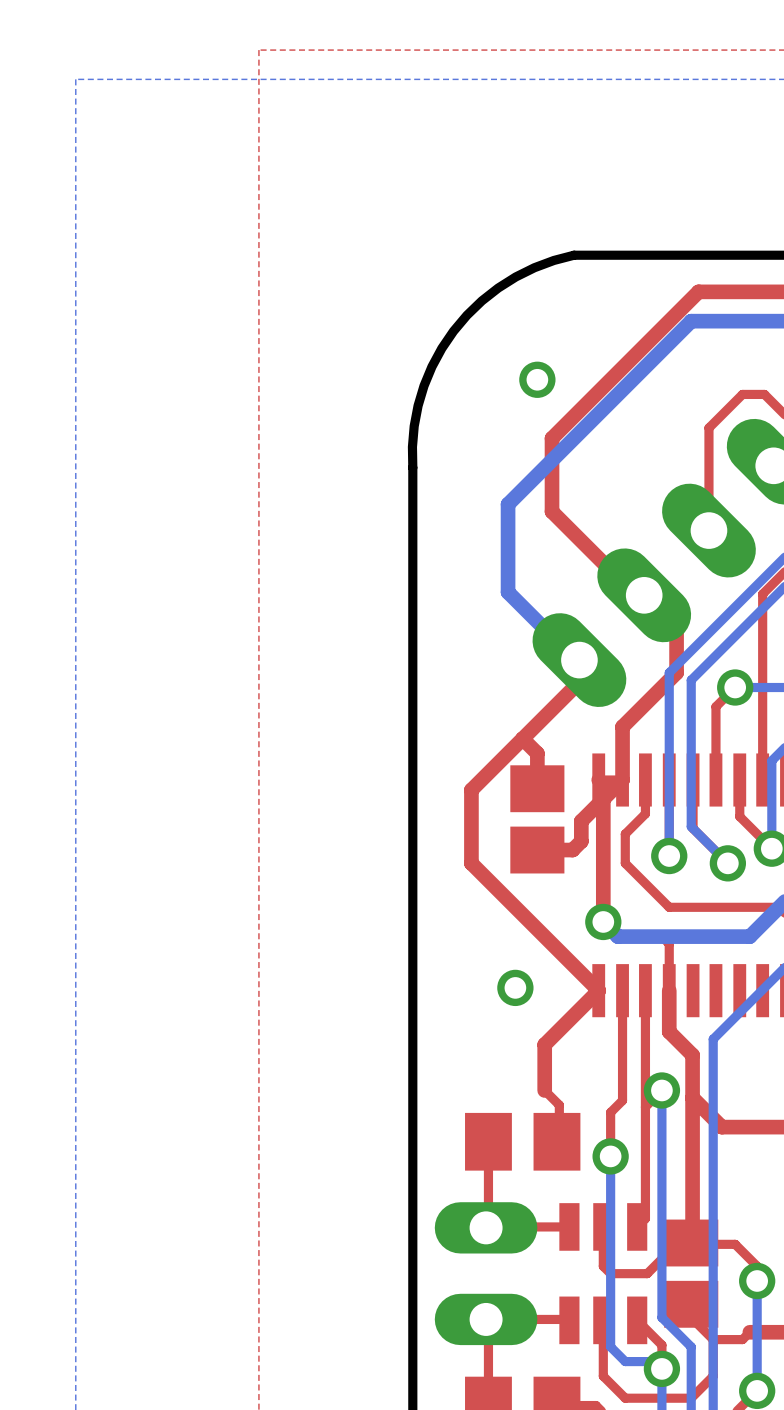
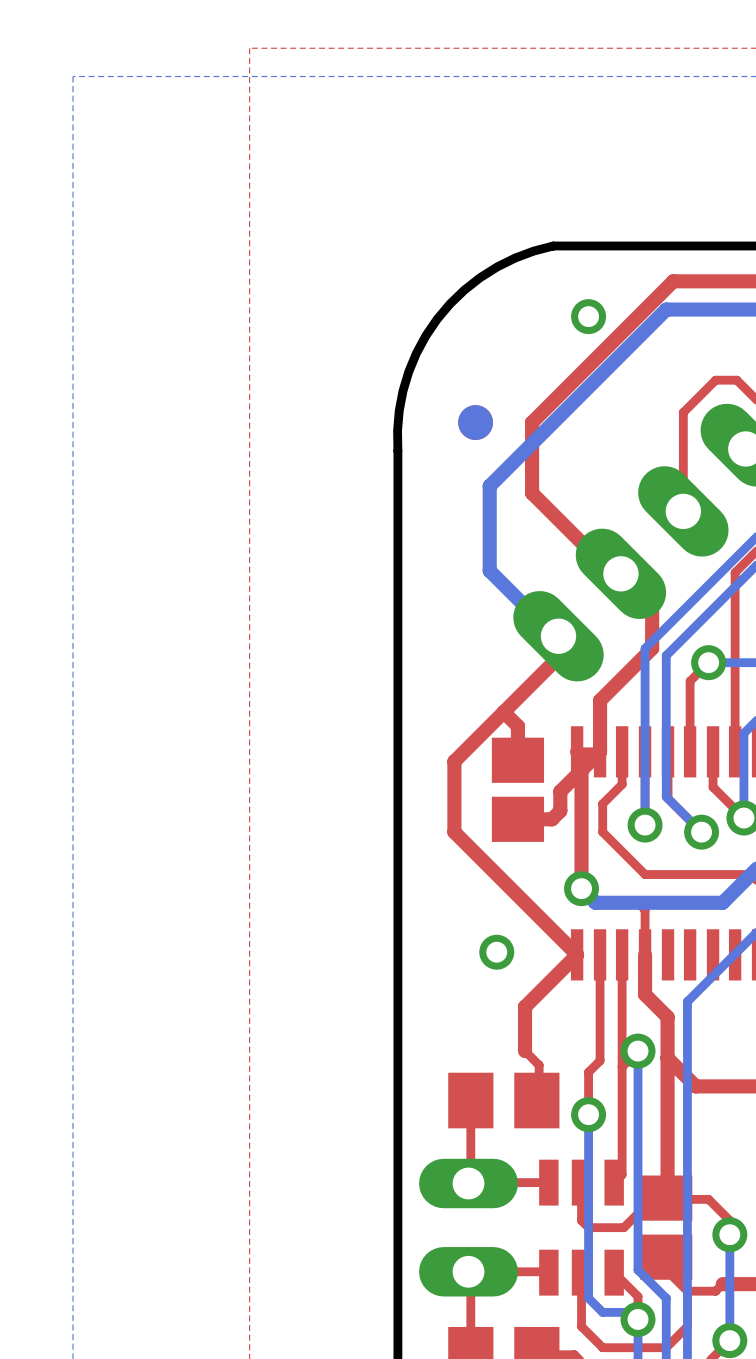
via position: (537, 379) -> (588, 316)
part: none -> (475, 422)

